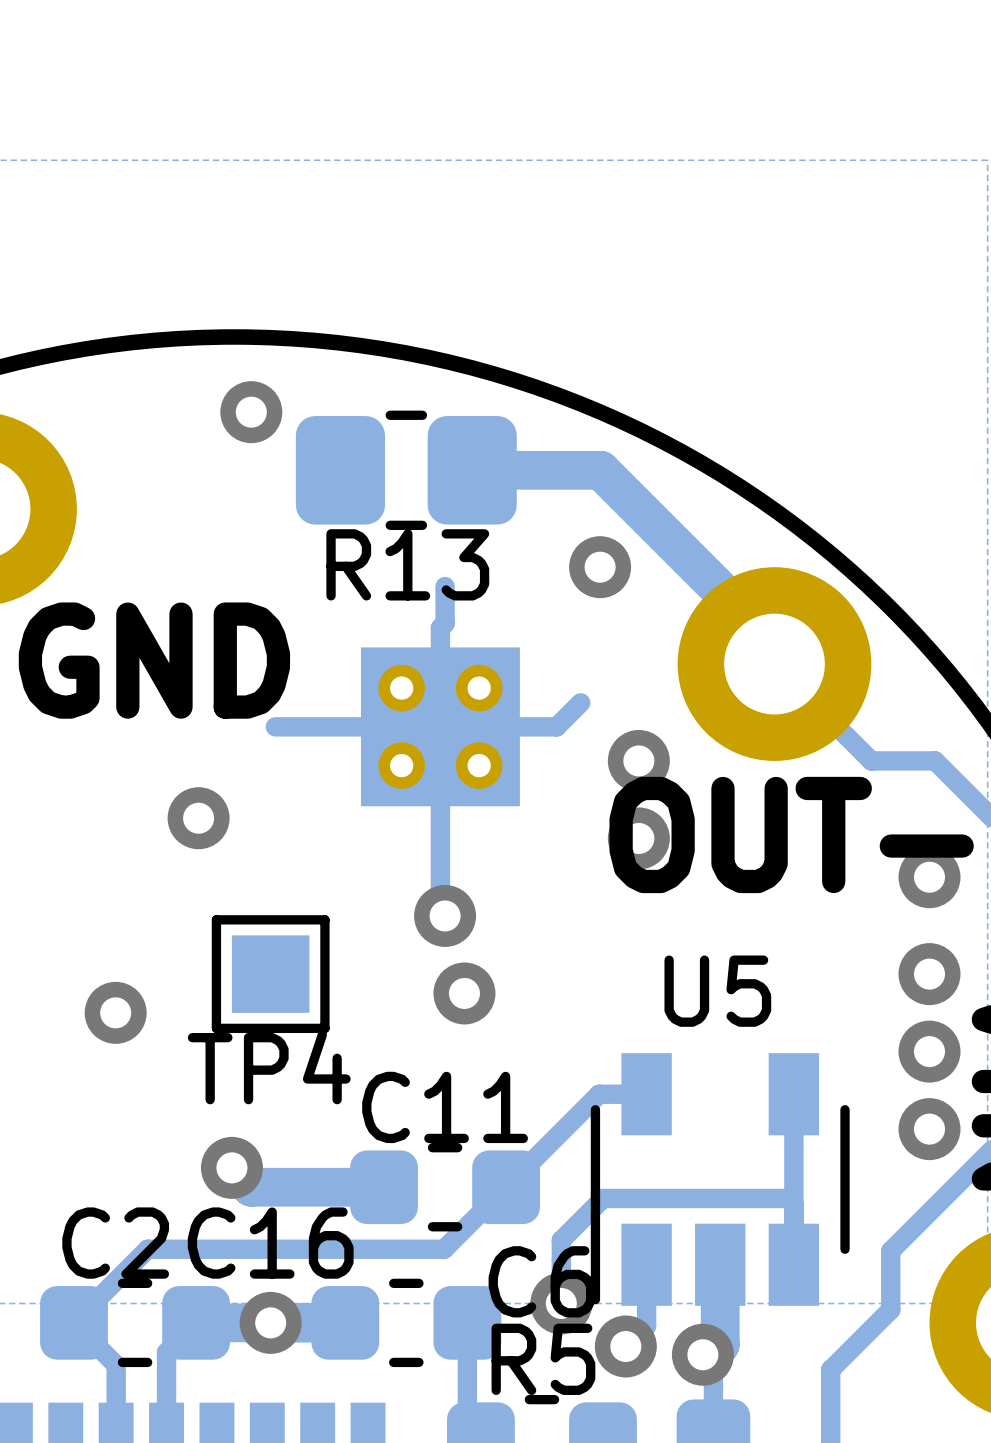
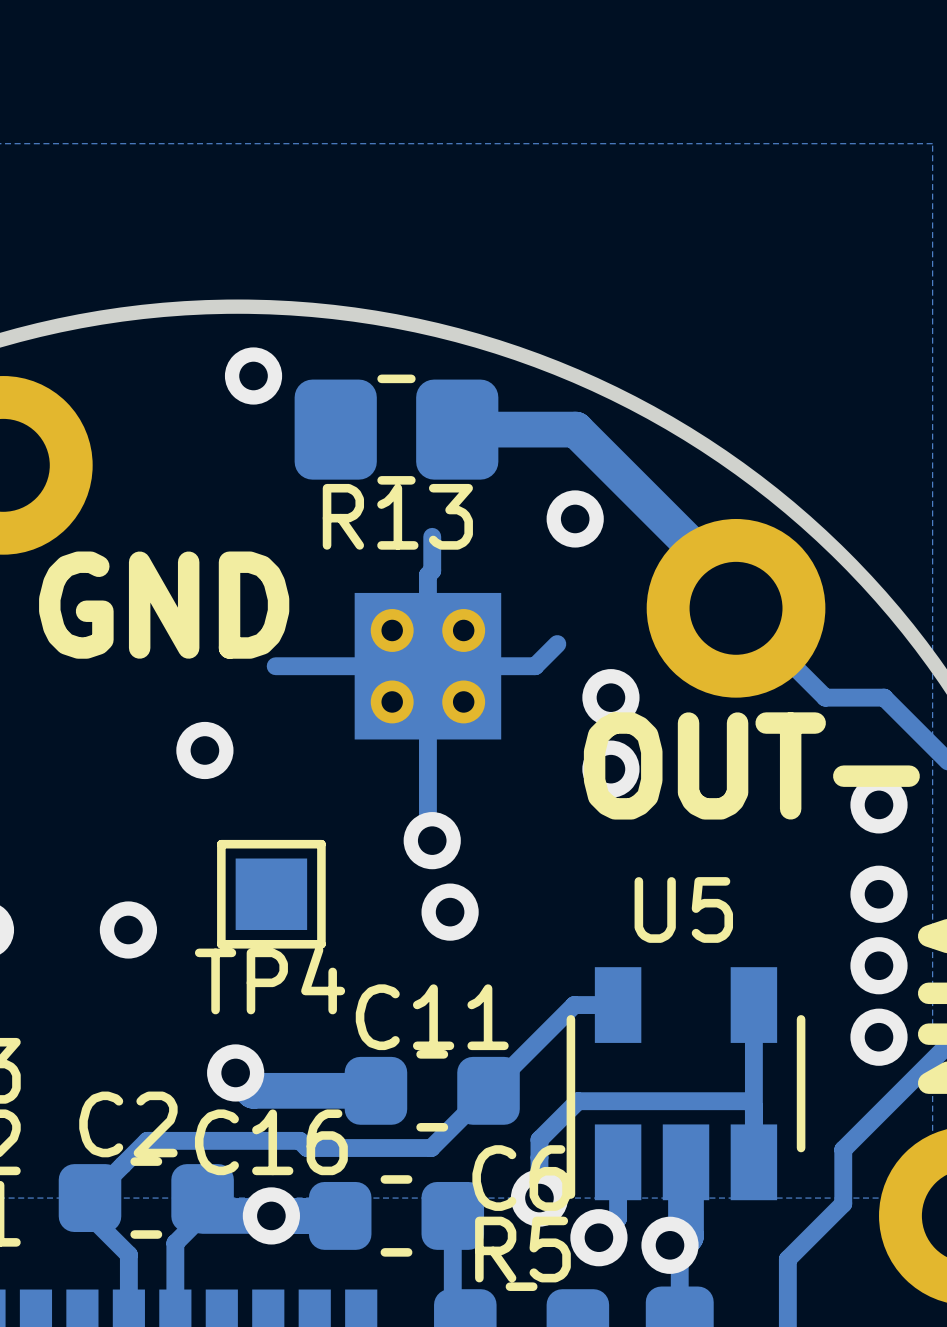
track: (309, 1249) (147, 1249) (74, 1322) -> (307, 1148) (299, 1140) (147, 1140) (90, 1198)
C2 position: (135, 1322) -> (146, 1198)

